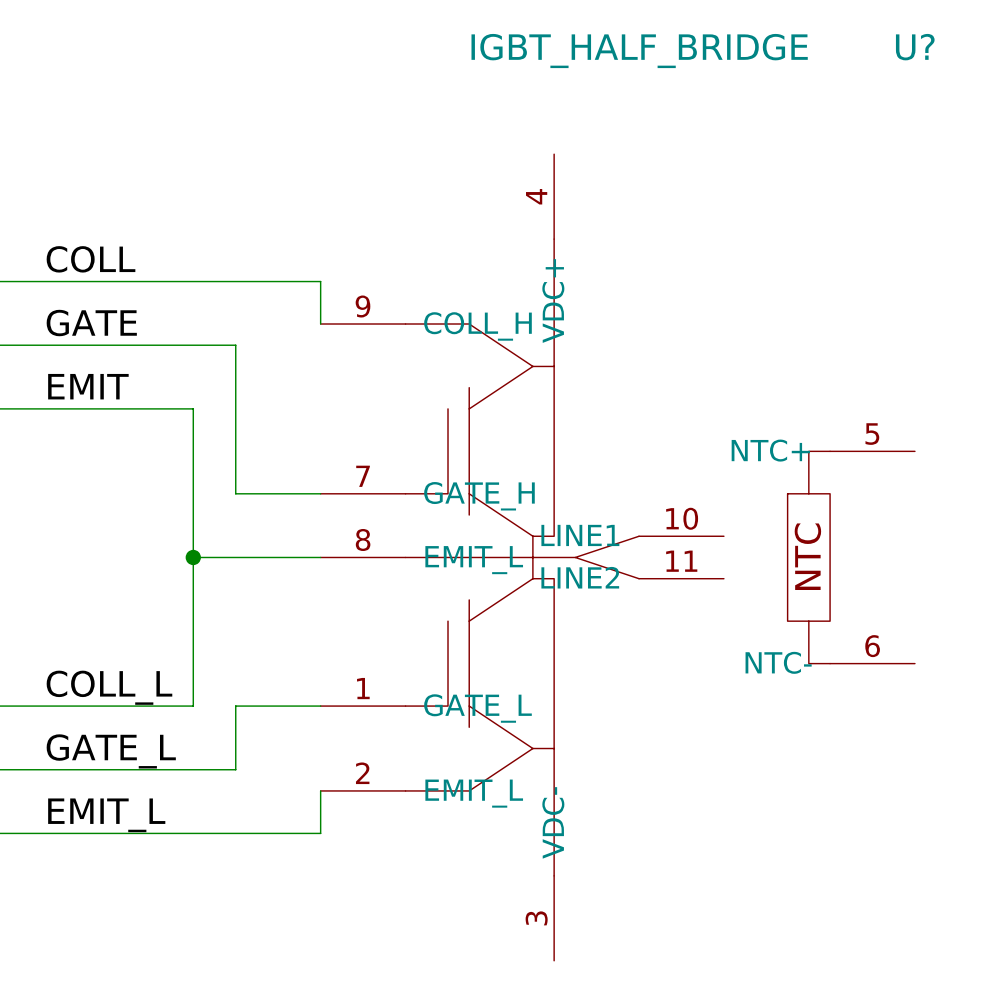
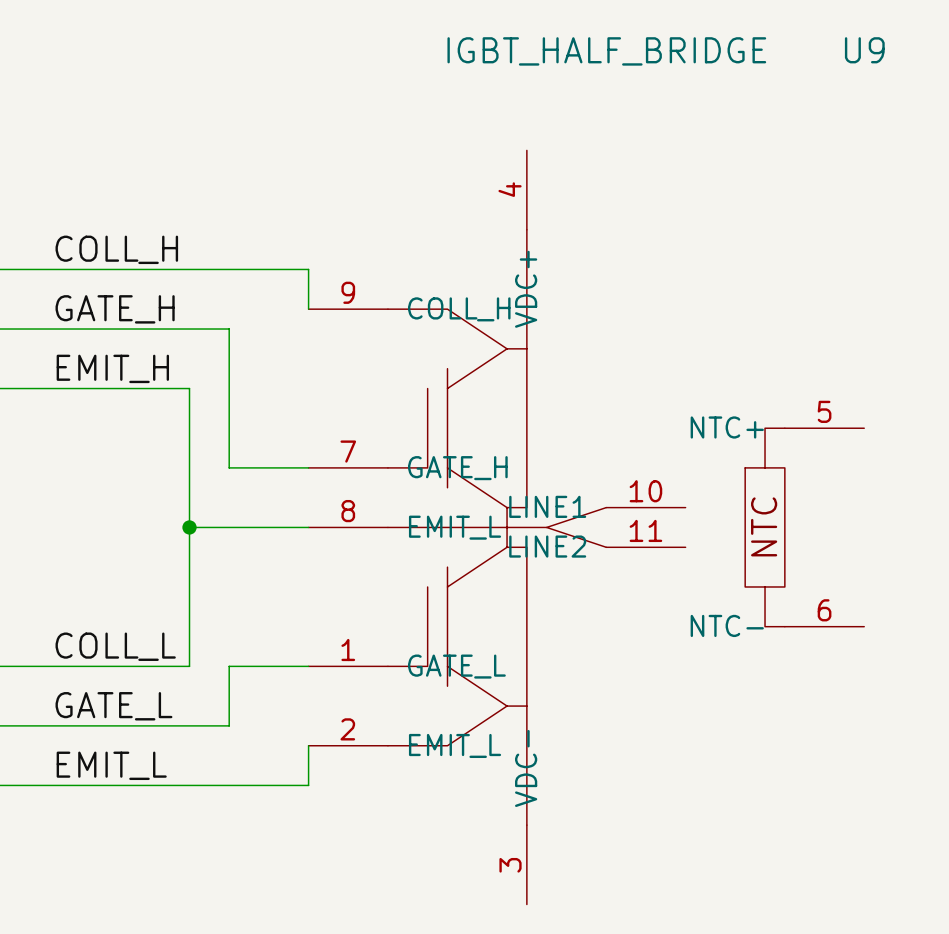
U? name: U? (915, 47) -> U9 (864, 50)
label: COLL (91, 259) -> COLL_H (116, 249)
label: GATE (91, 323) -> GATE_H (115, 309)
label: EMIT (88, 386) -> EMIT_H (112, 368)

